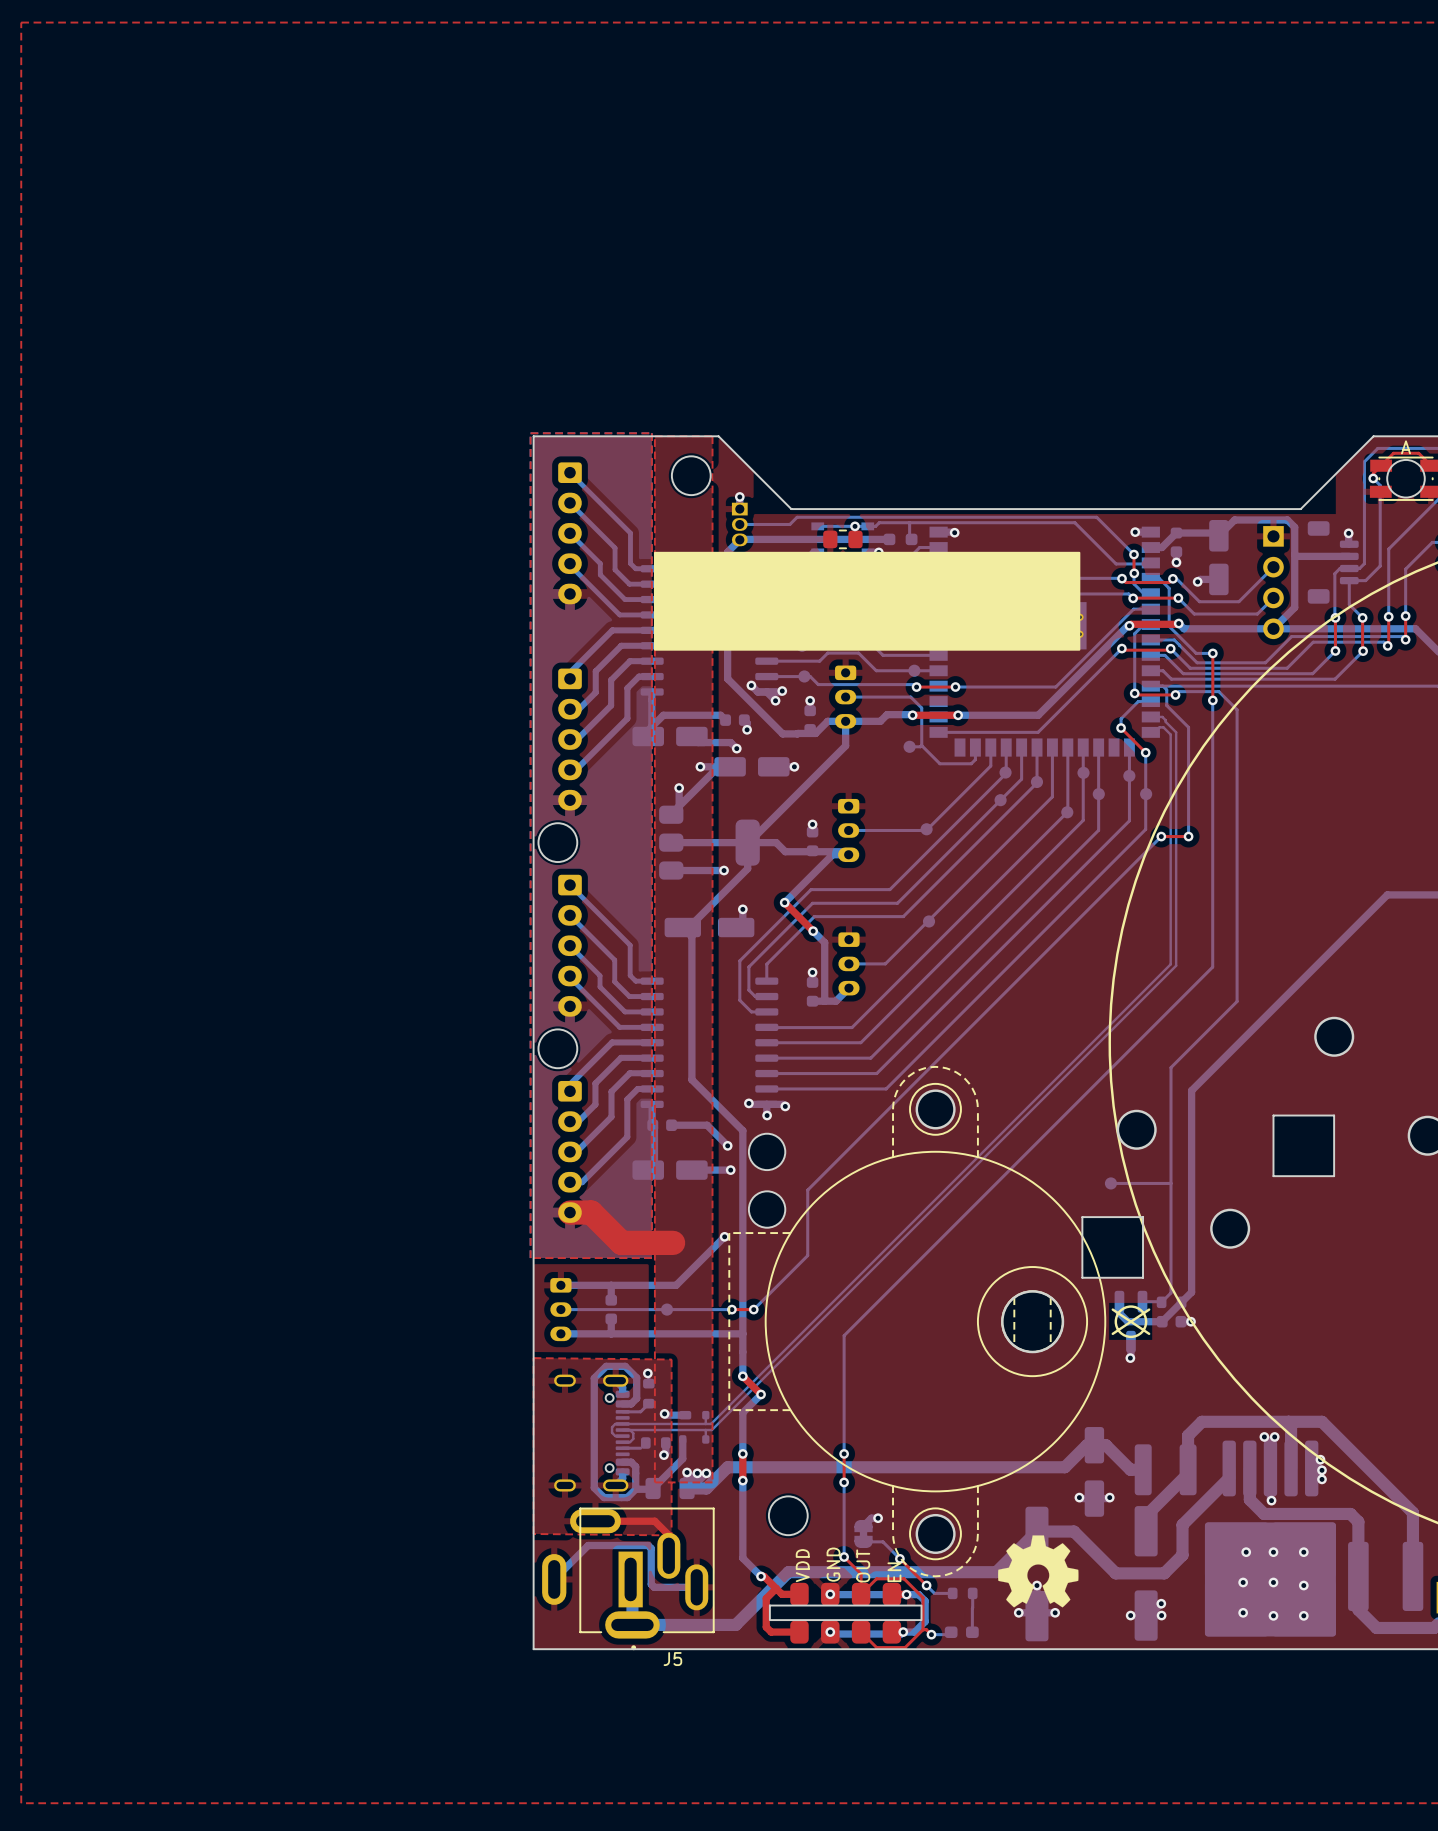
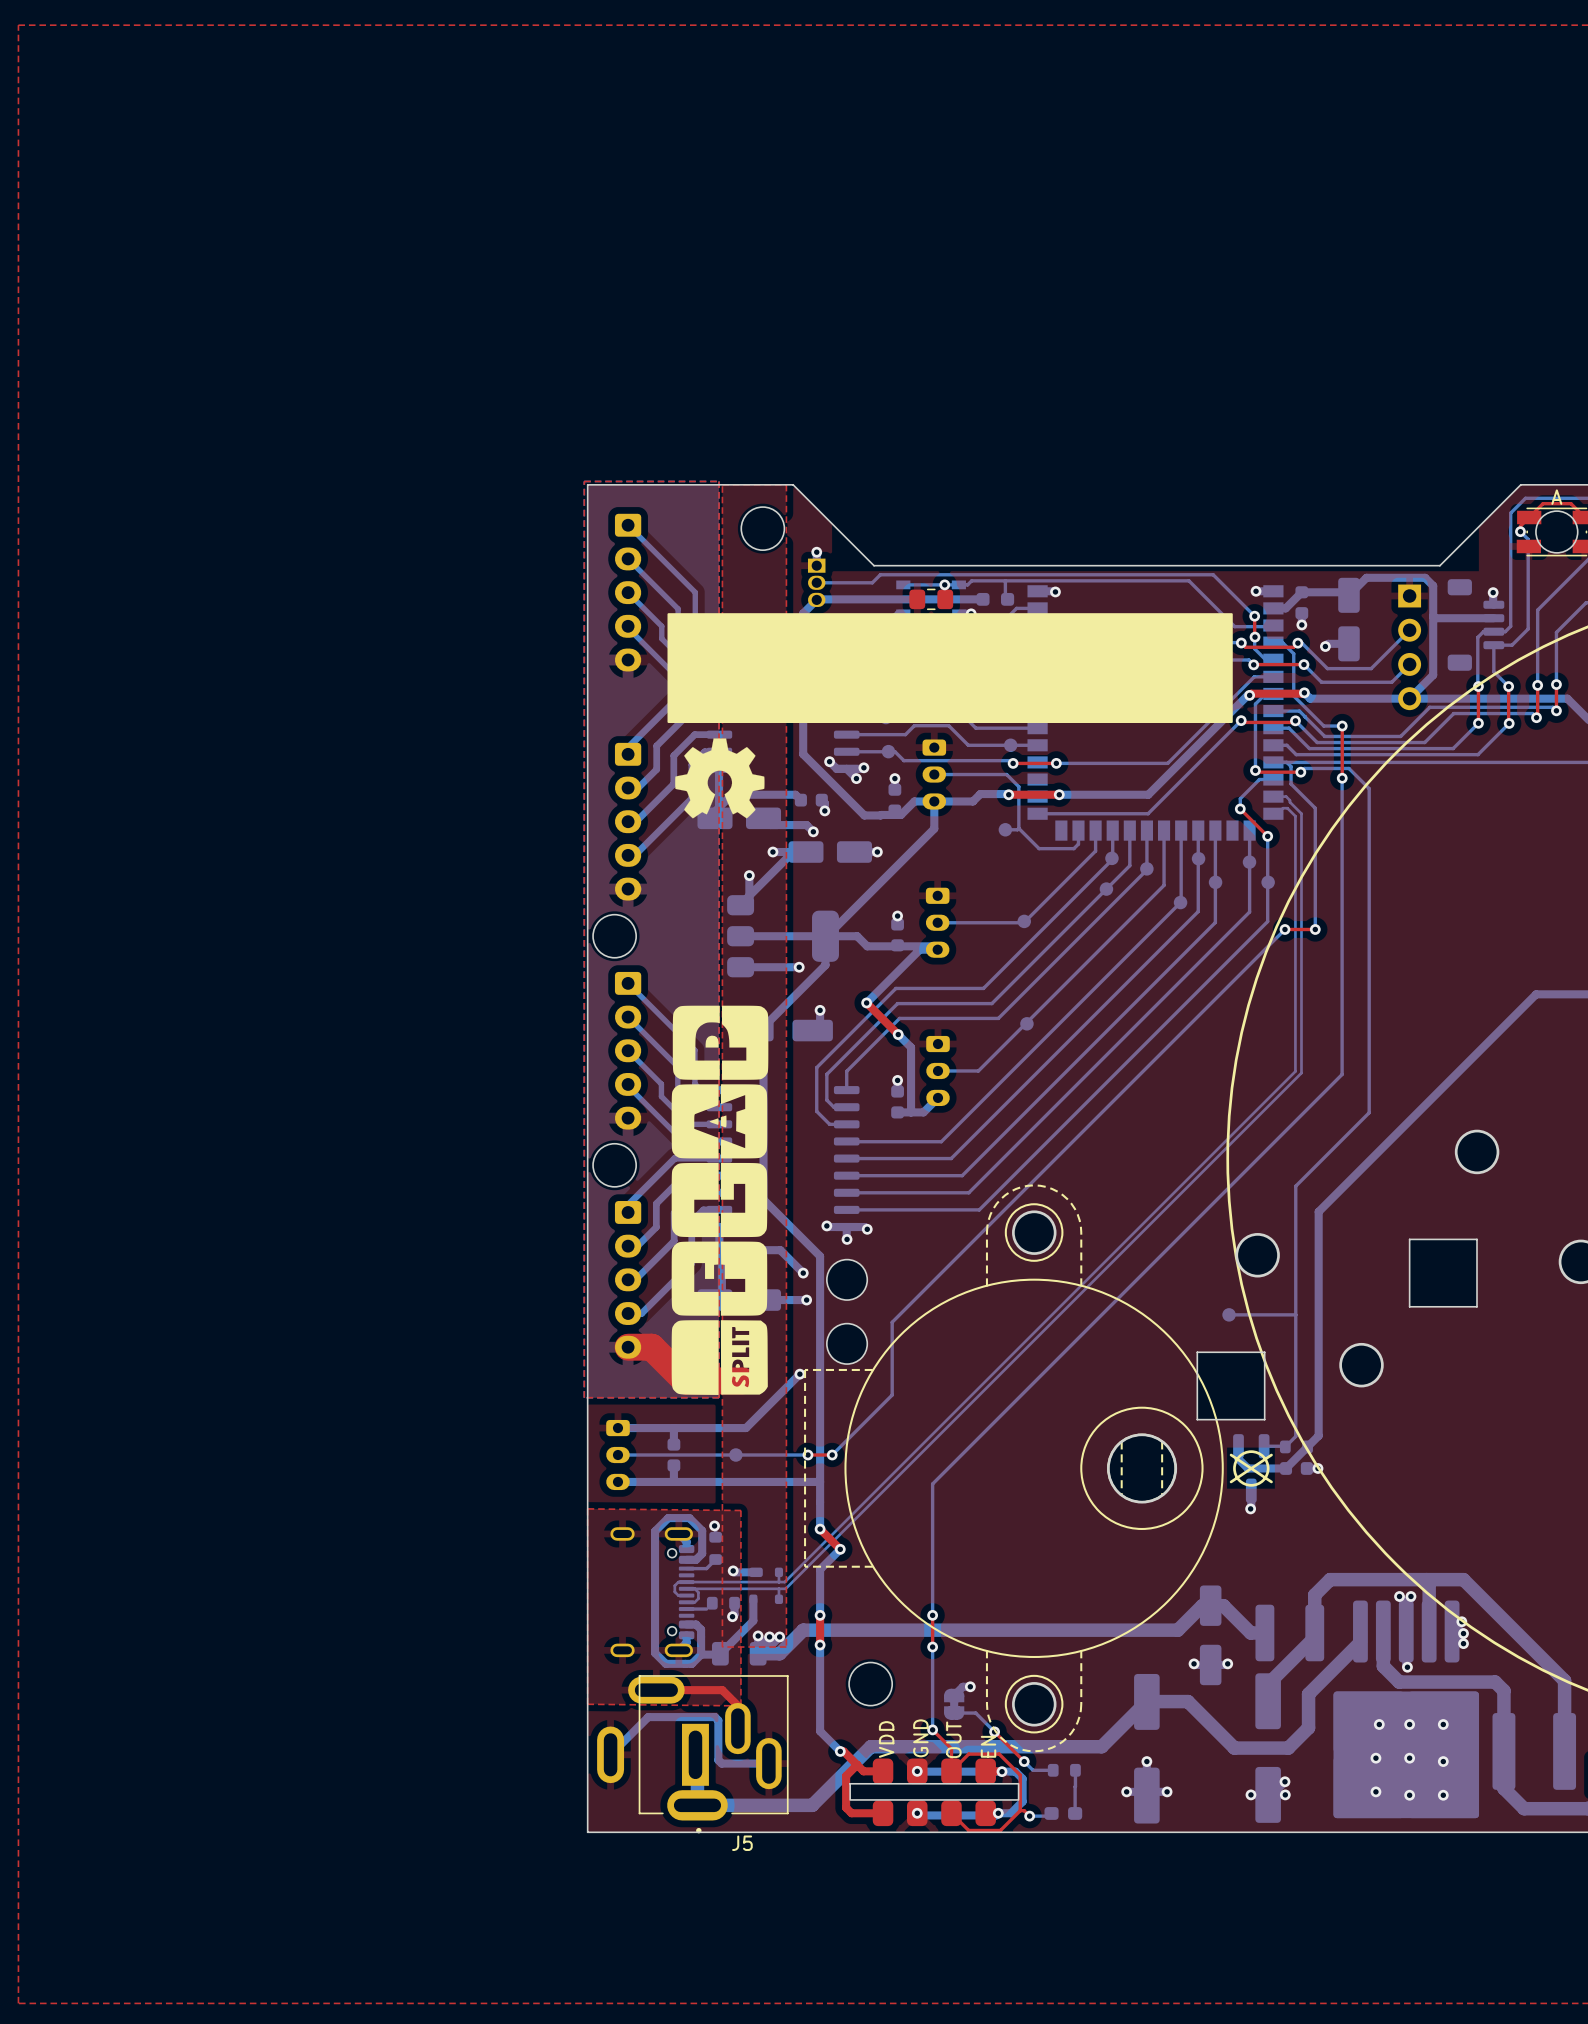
drawing shape: [653, 551, 1081, 651] -> [667, 613, 1233, 723]
drawing: none -> [675, 738, 765, 819]
drawing: none -> [671, 1005, 769, 1395]
drawing: [998, 1535, 1079, 1608] -> none

